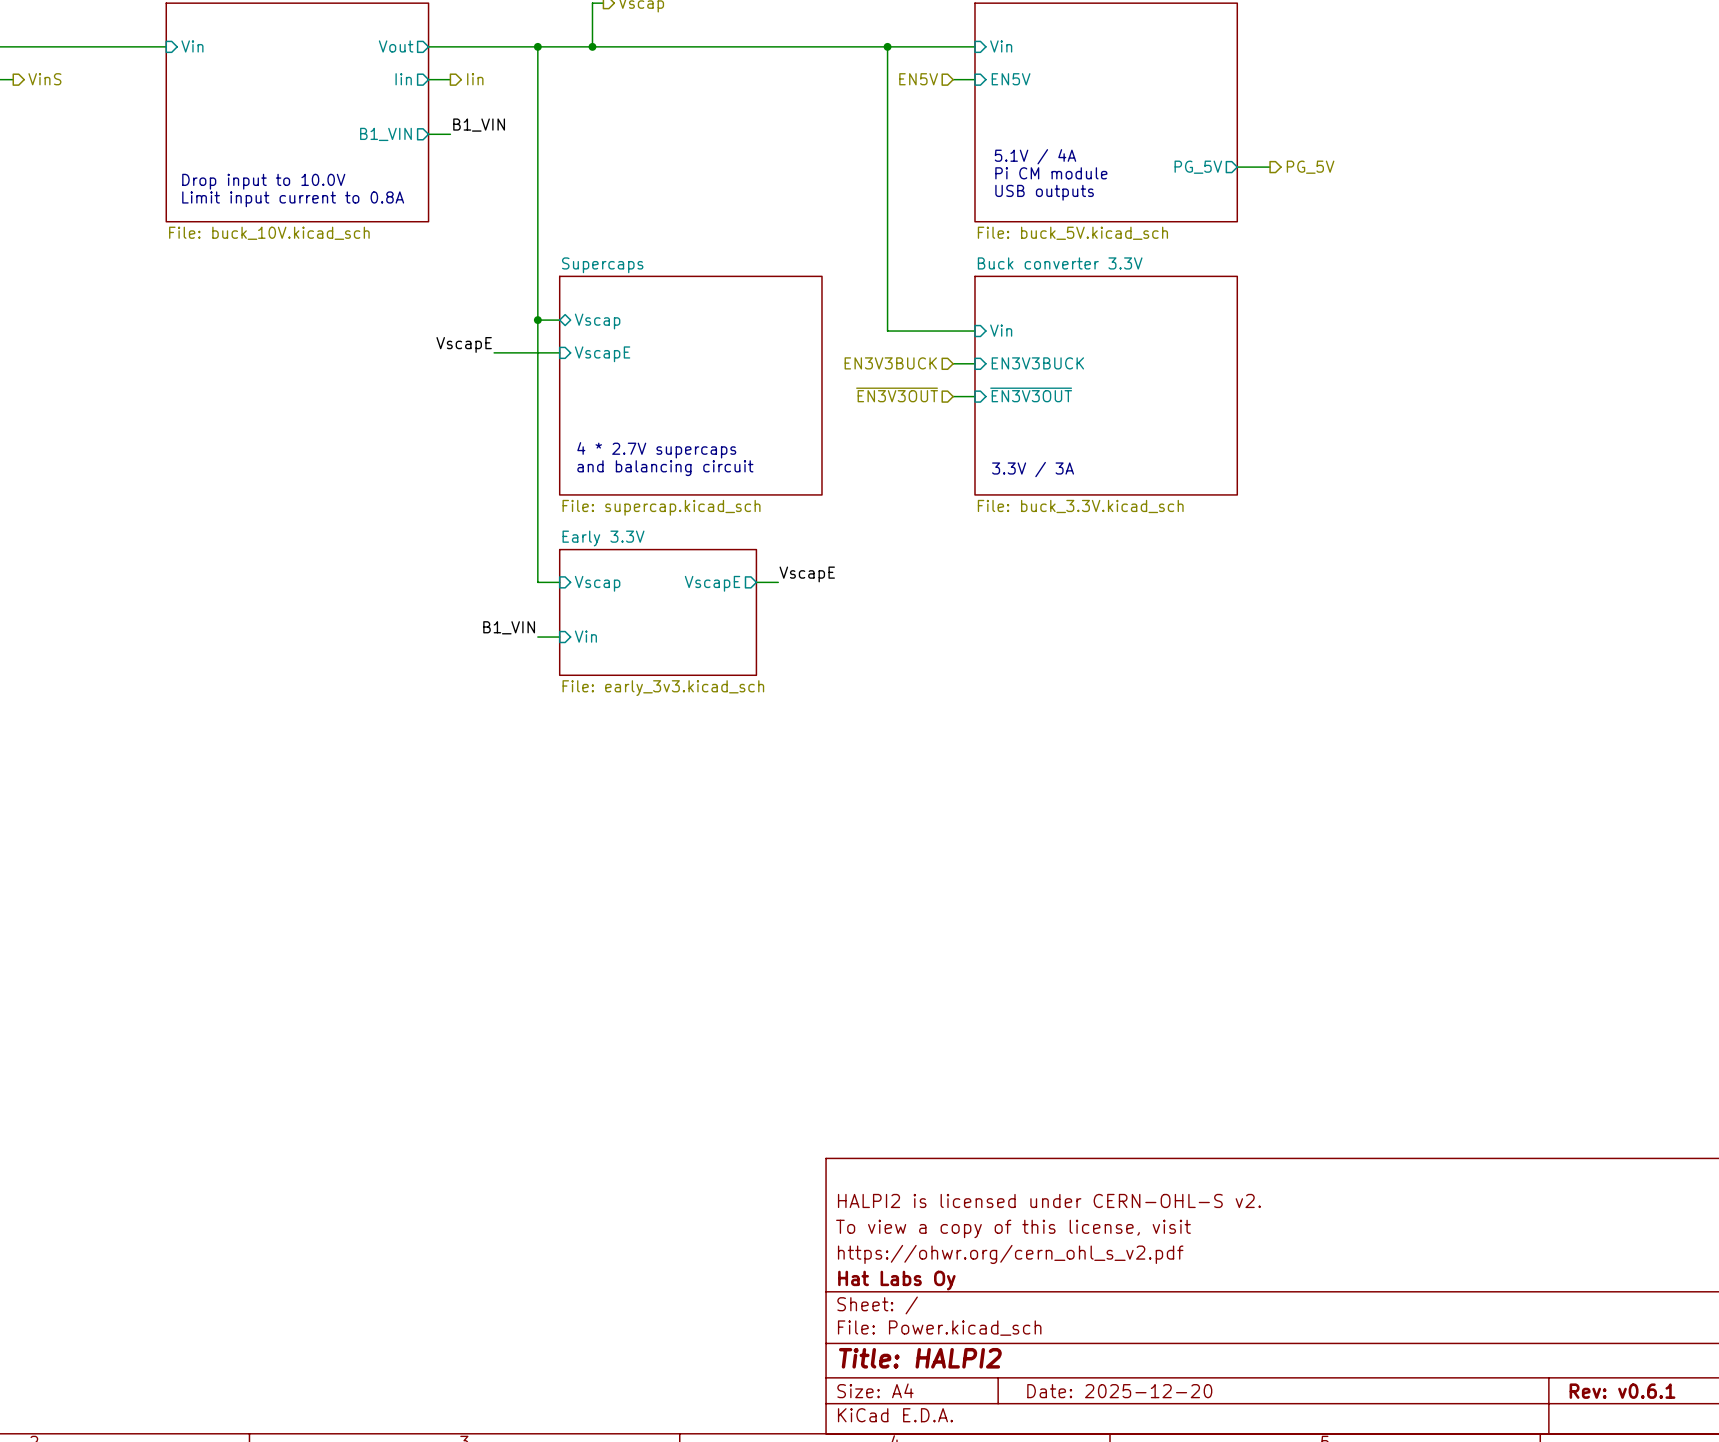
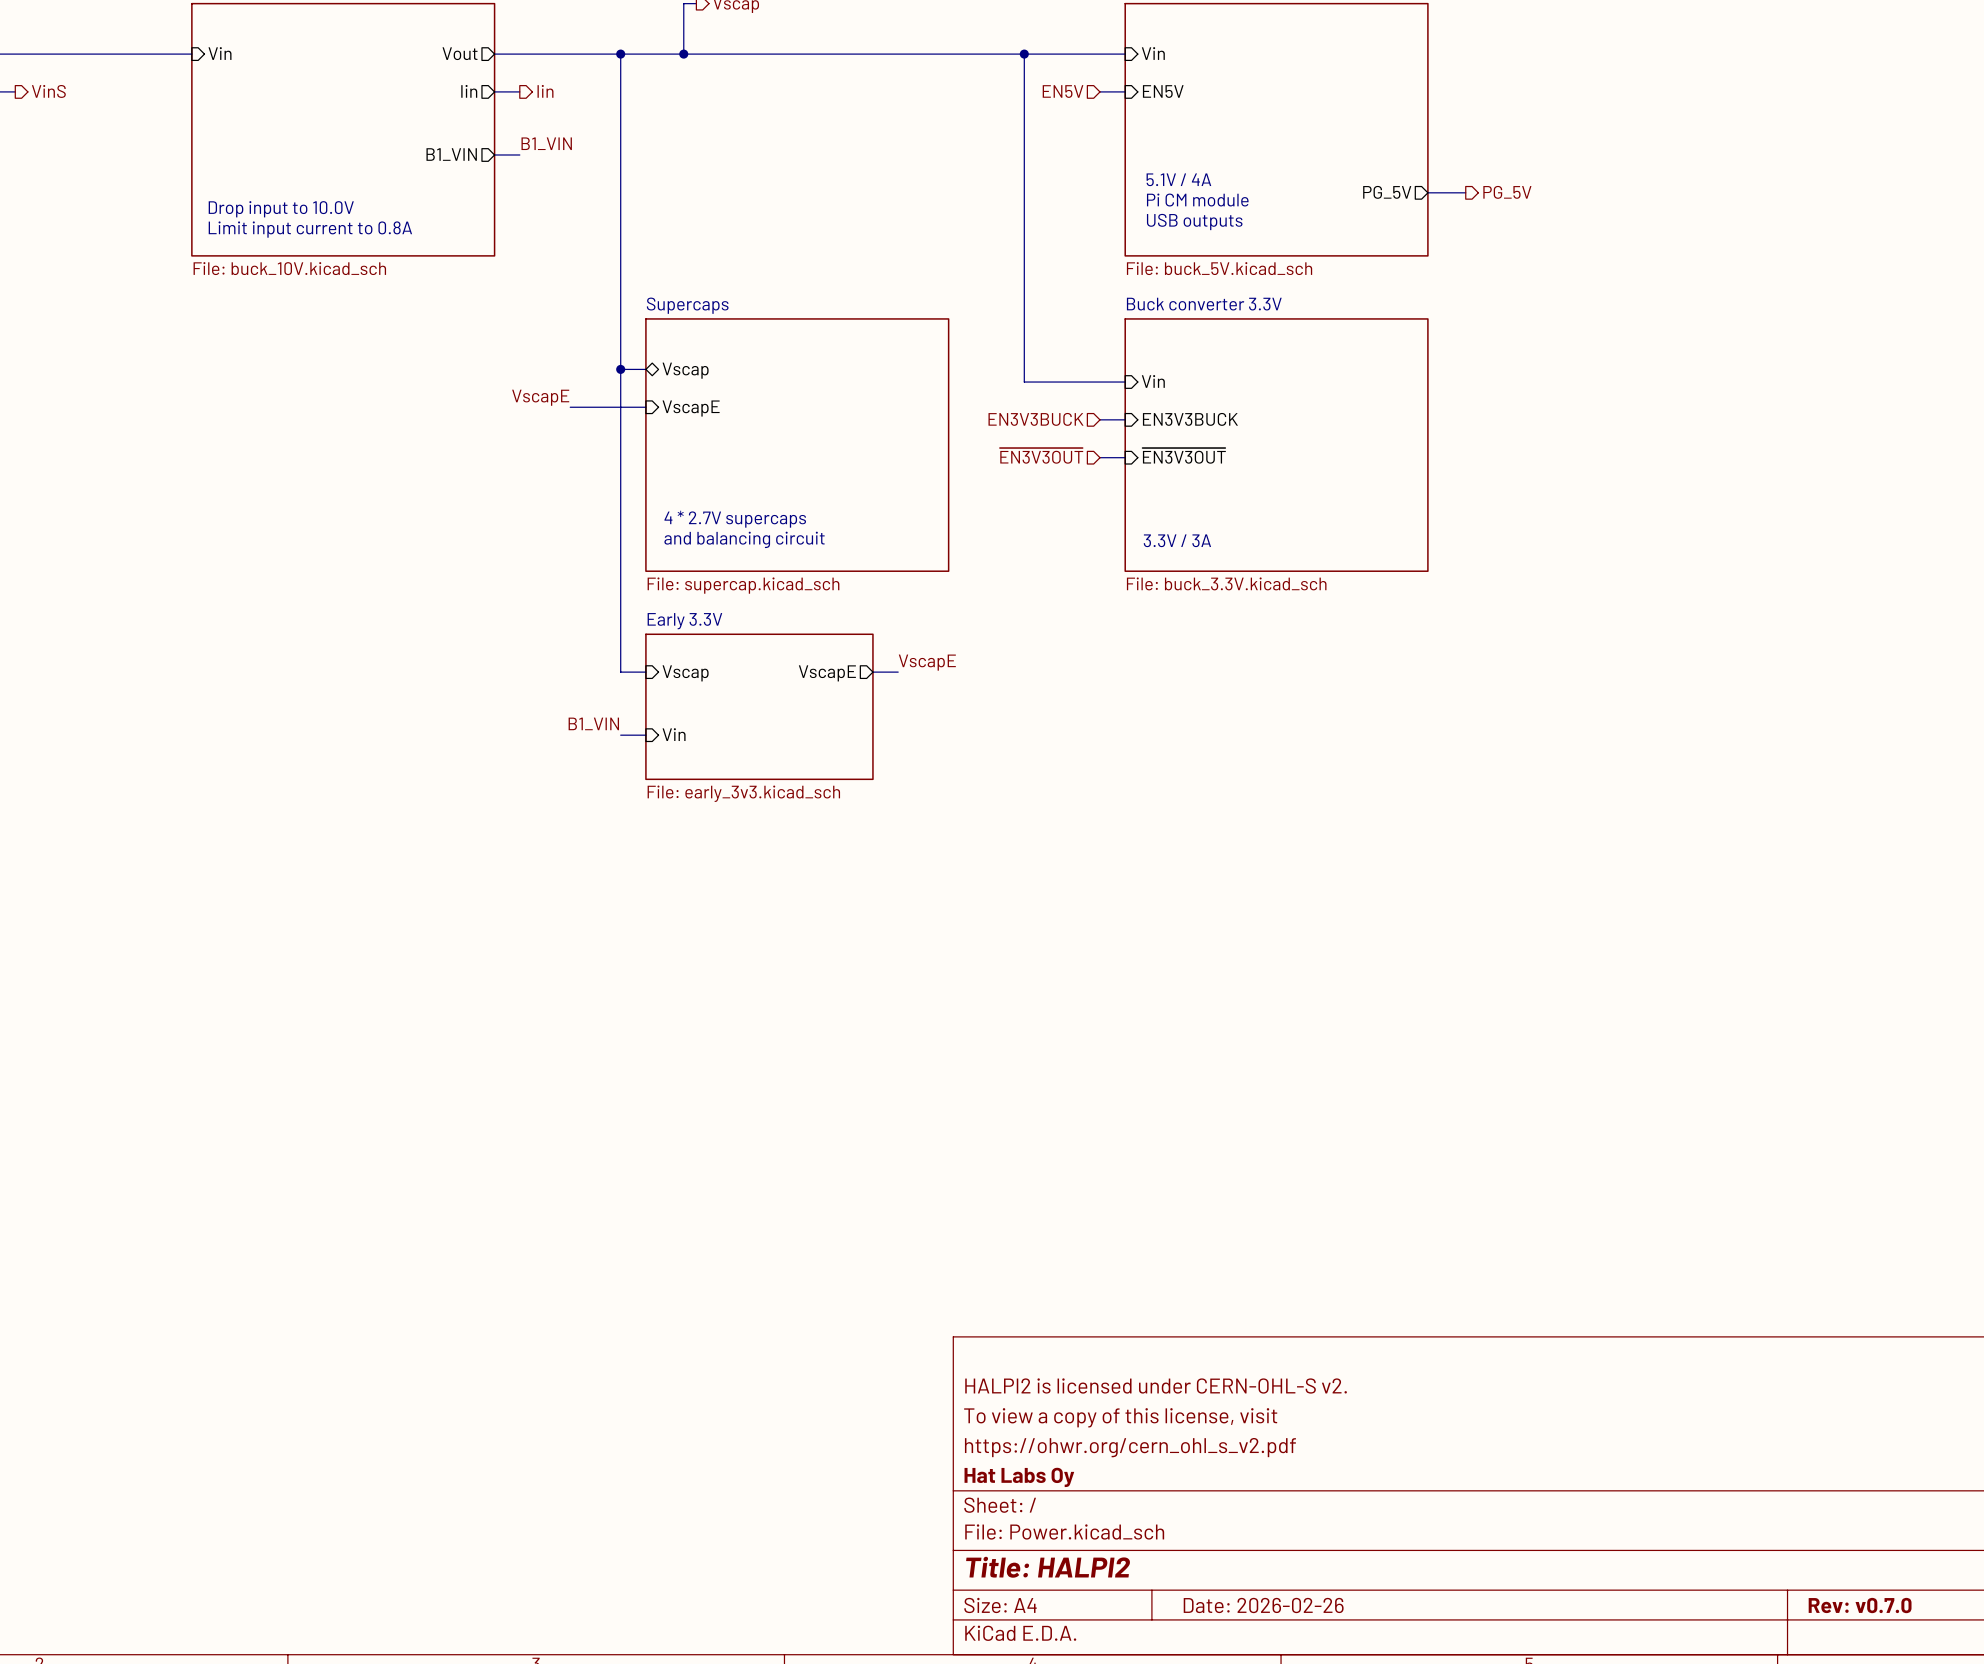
title block: Date: 2025-12-20 (1119, 1391) -> Date: 2026-02-26 (1263, 1605)
title block: Rev: v0.6.1 (1622, 1391) -> Rev: v0.7.0 (1860, 1605)

